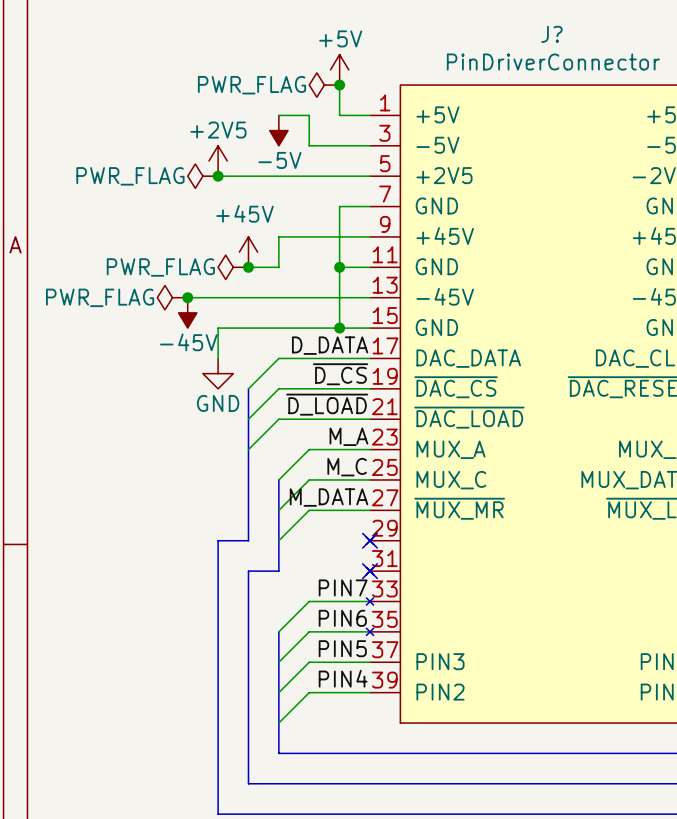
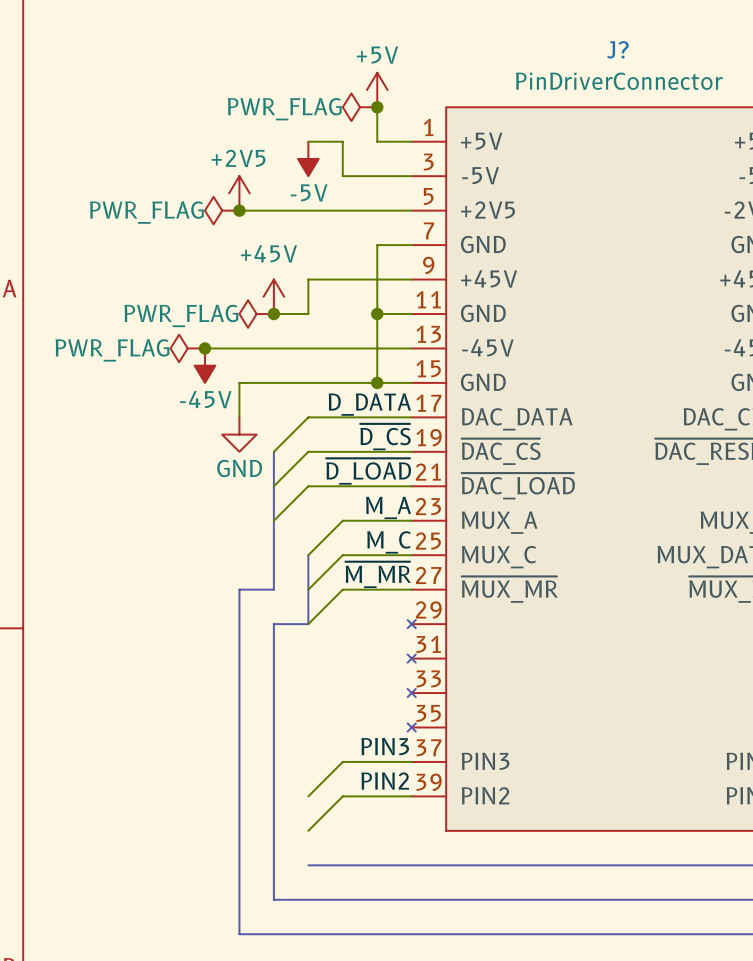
label: M_DATA (329, 497) -> ~{M_MR} (378, 574)
bus: (248, 510) (248, 540) (218, 540) -> (273, 589) (239, 589) (239, 624)
bus: (278, 540) (278, 571) (248, 571) -> (308, 624) (273, 624) (273, 658)
no-connect mark: (370, 540) -> none
no-connect mark: (370, 571) -> none
label: PIN7 (343, 587) -> none
wire: (370, 601) (309, 601) (278, 631) -> none
label: PIN6 (342, 618) -> none
bus: (278, 631) (278, 753) -> none
wire: (370, 631) (309, 631) (278, 662) -> none
label: PIN5 (342, 648) -> PIN3 (385, 746)
label: PIN4 (343, 678) -> PIN2 (385, 781)

